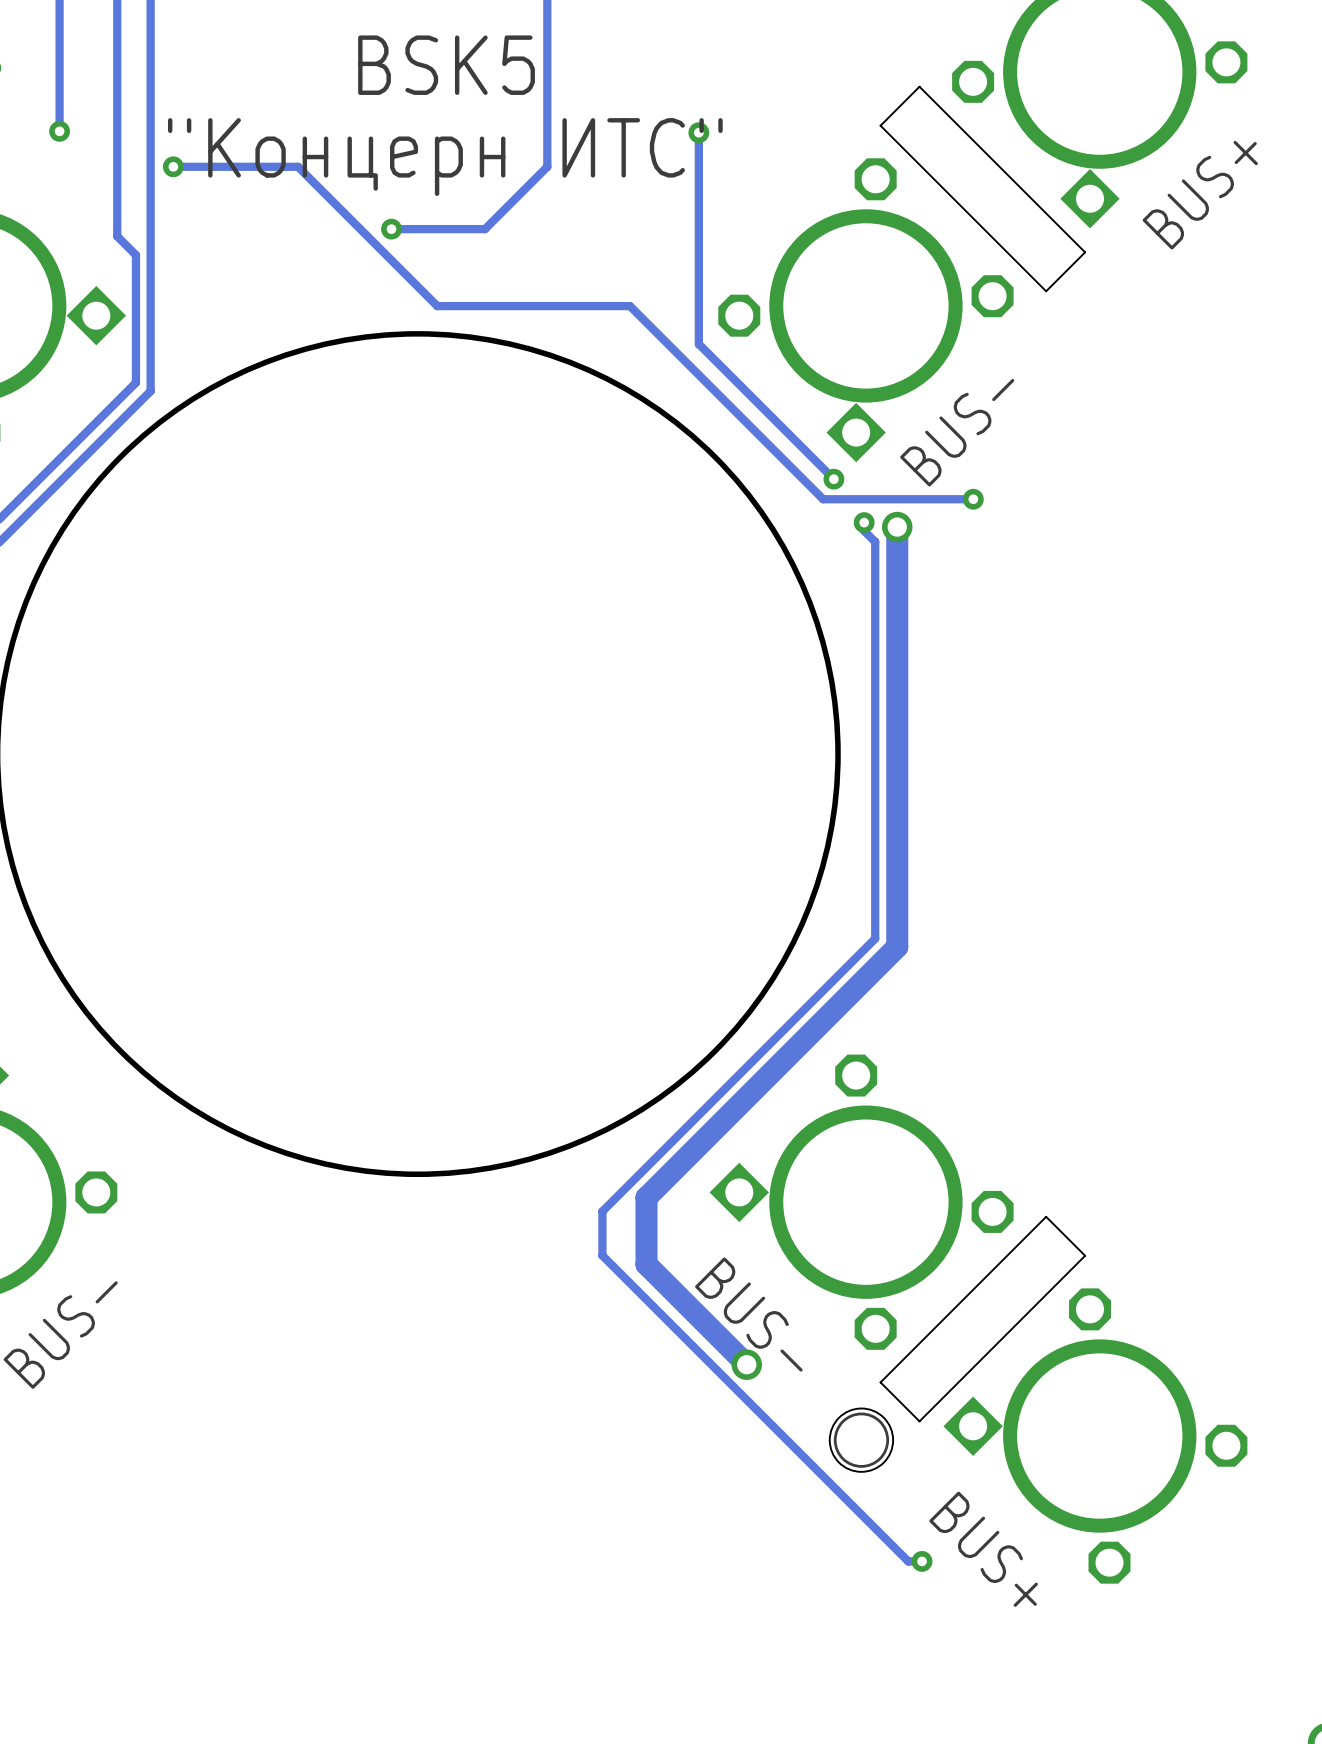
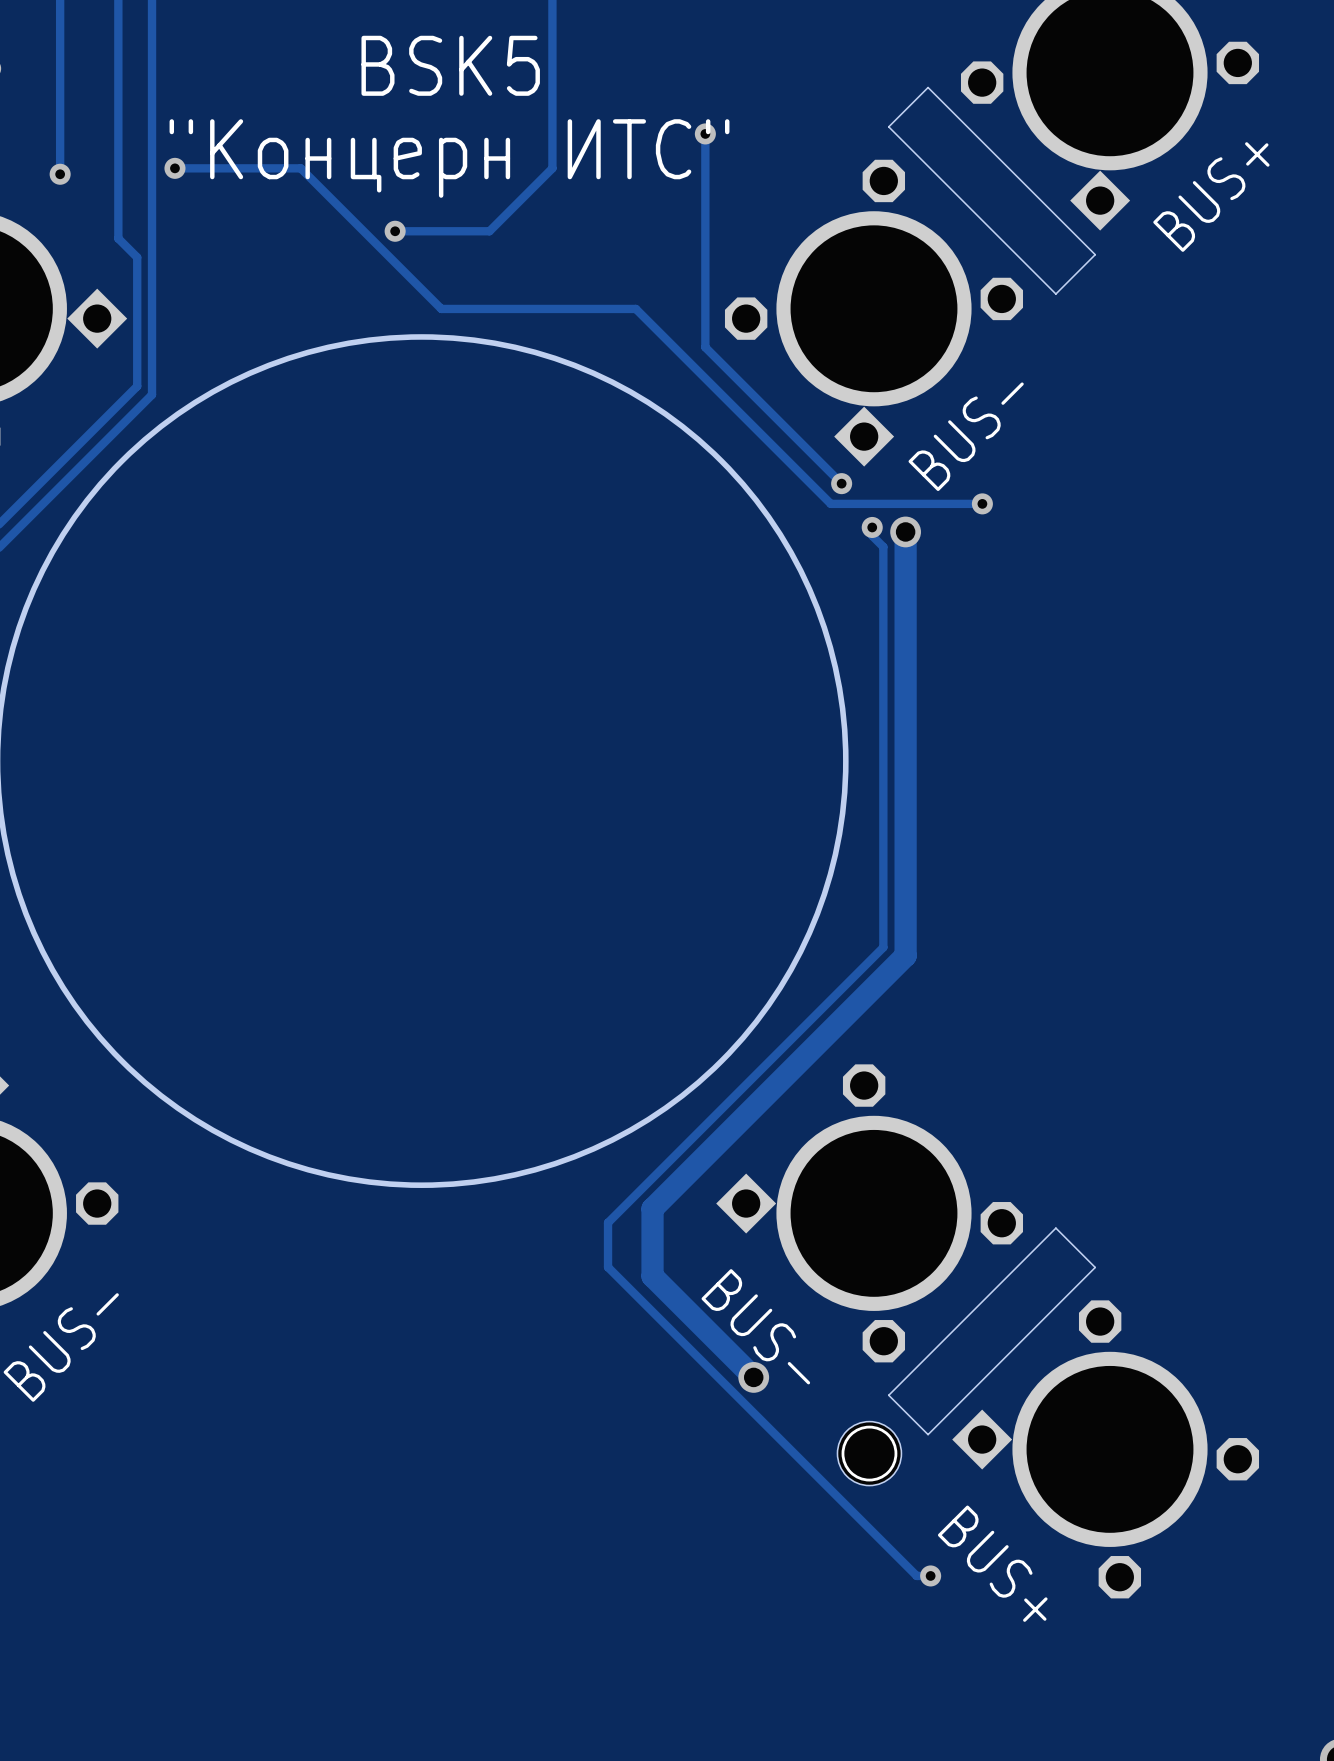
track: none -> (60, 132) (60, 174)
via position: (59, 131) -> (60, 174)

